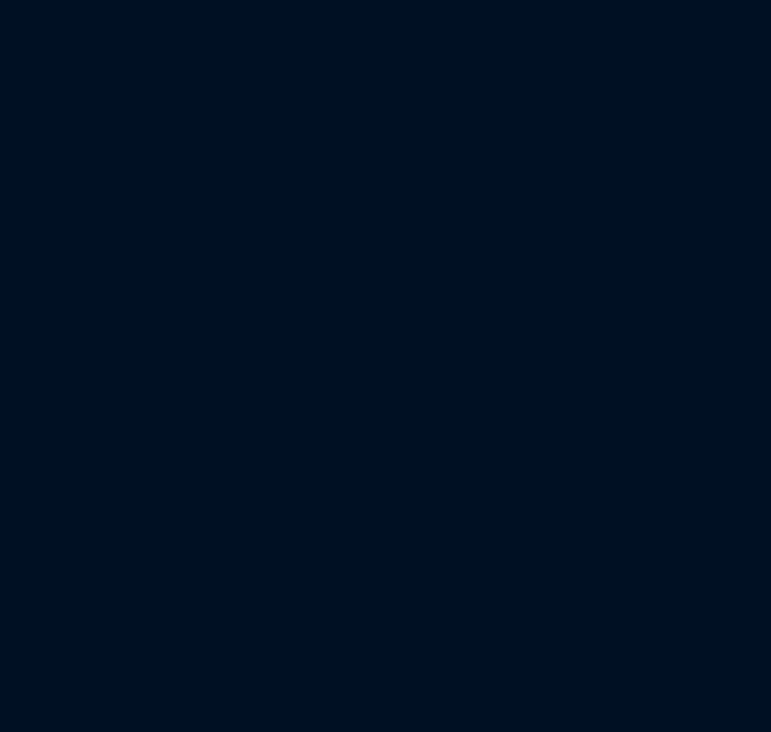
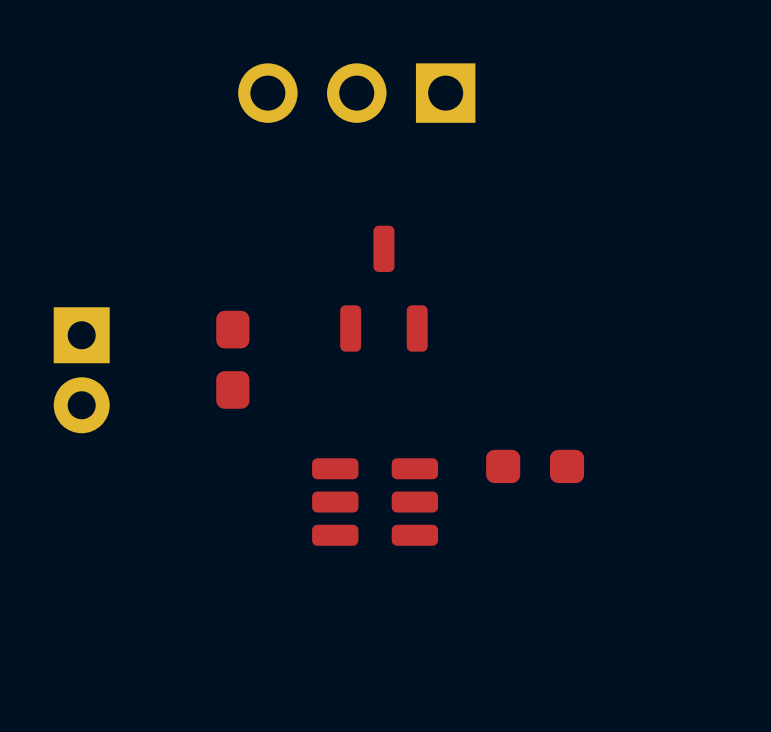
part: none -> (356, 93)
part: none -> (383, 288)
part: none -> (232, 359)
part: none -> (81, 370)
part: none -> (535, 466)
part: none -> (375, 502)

